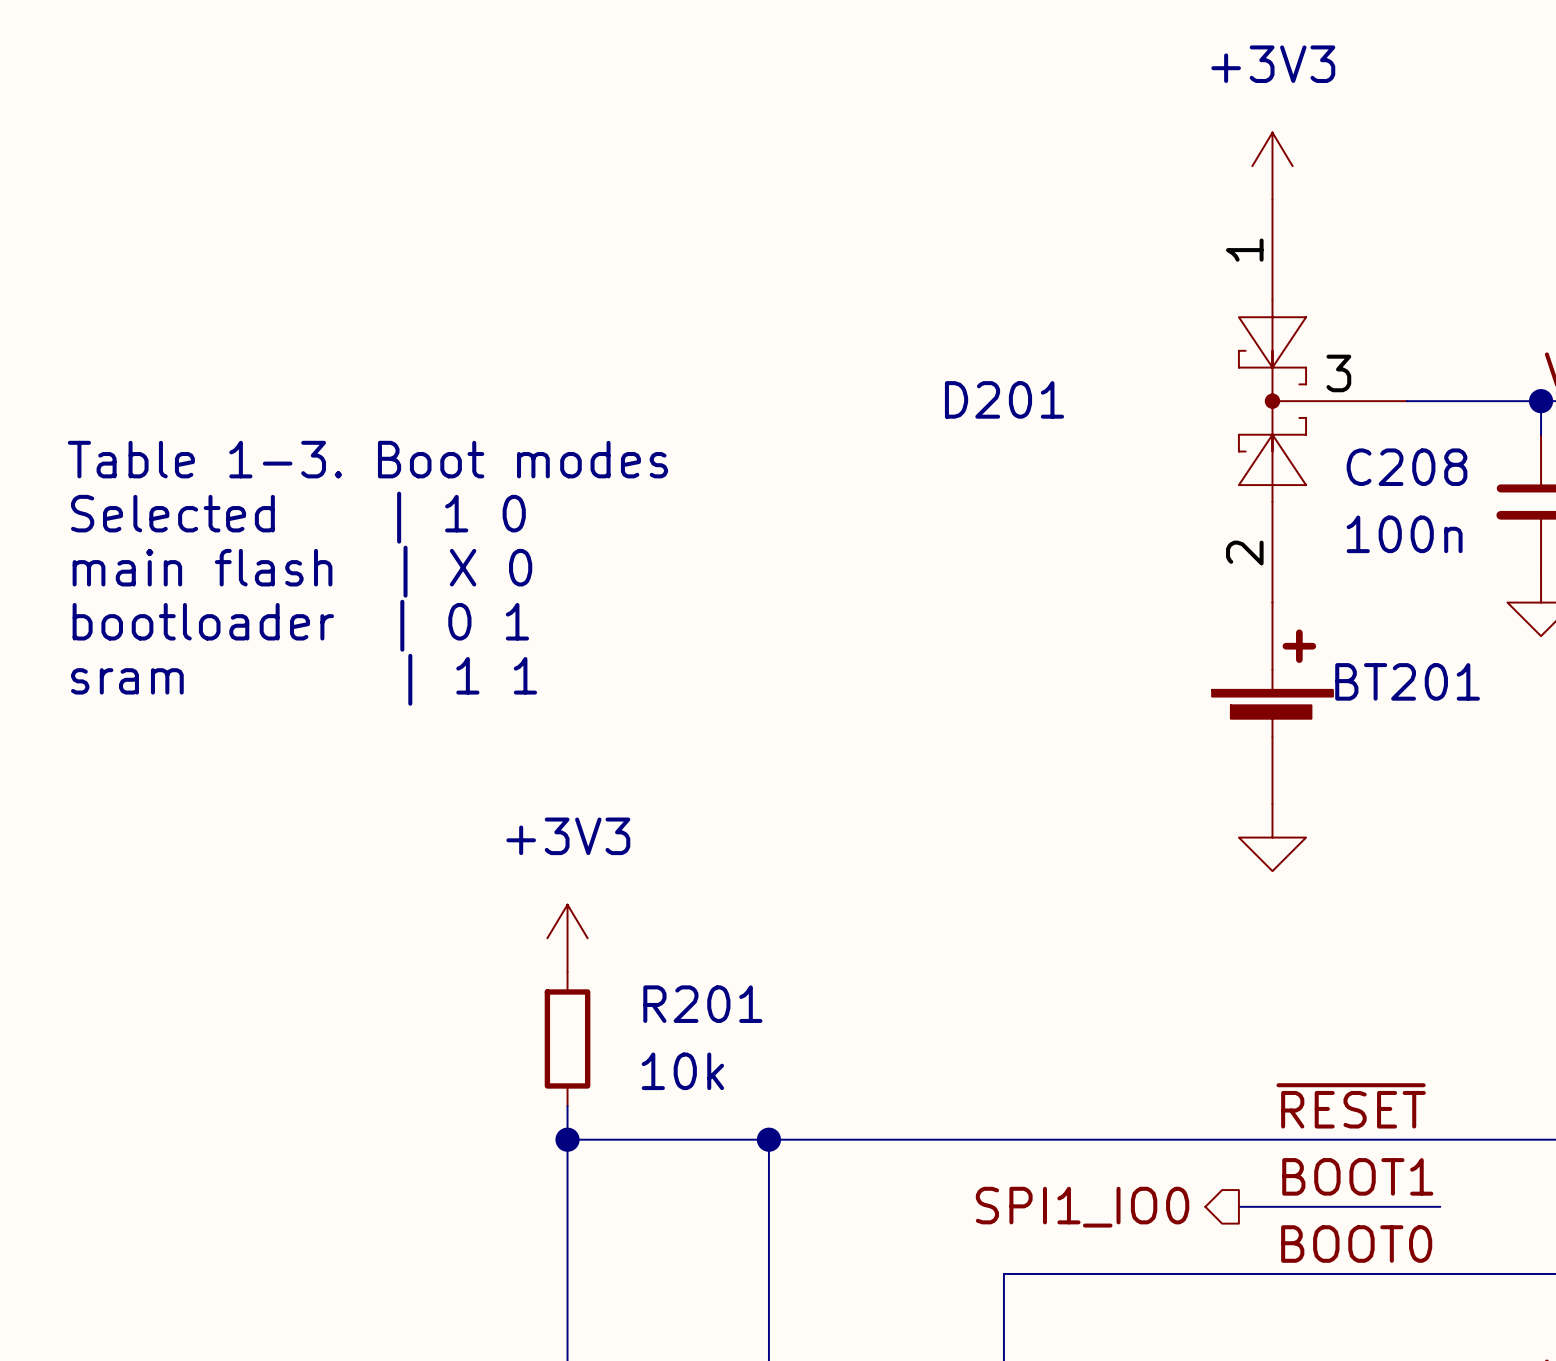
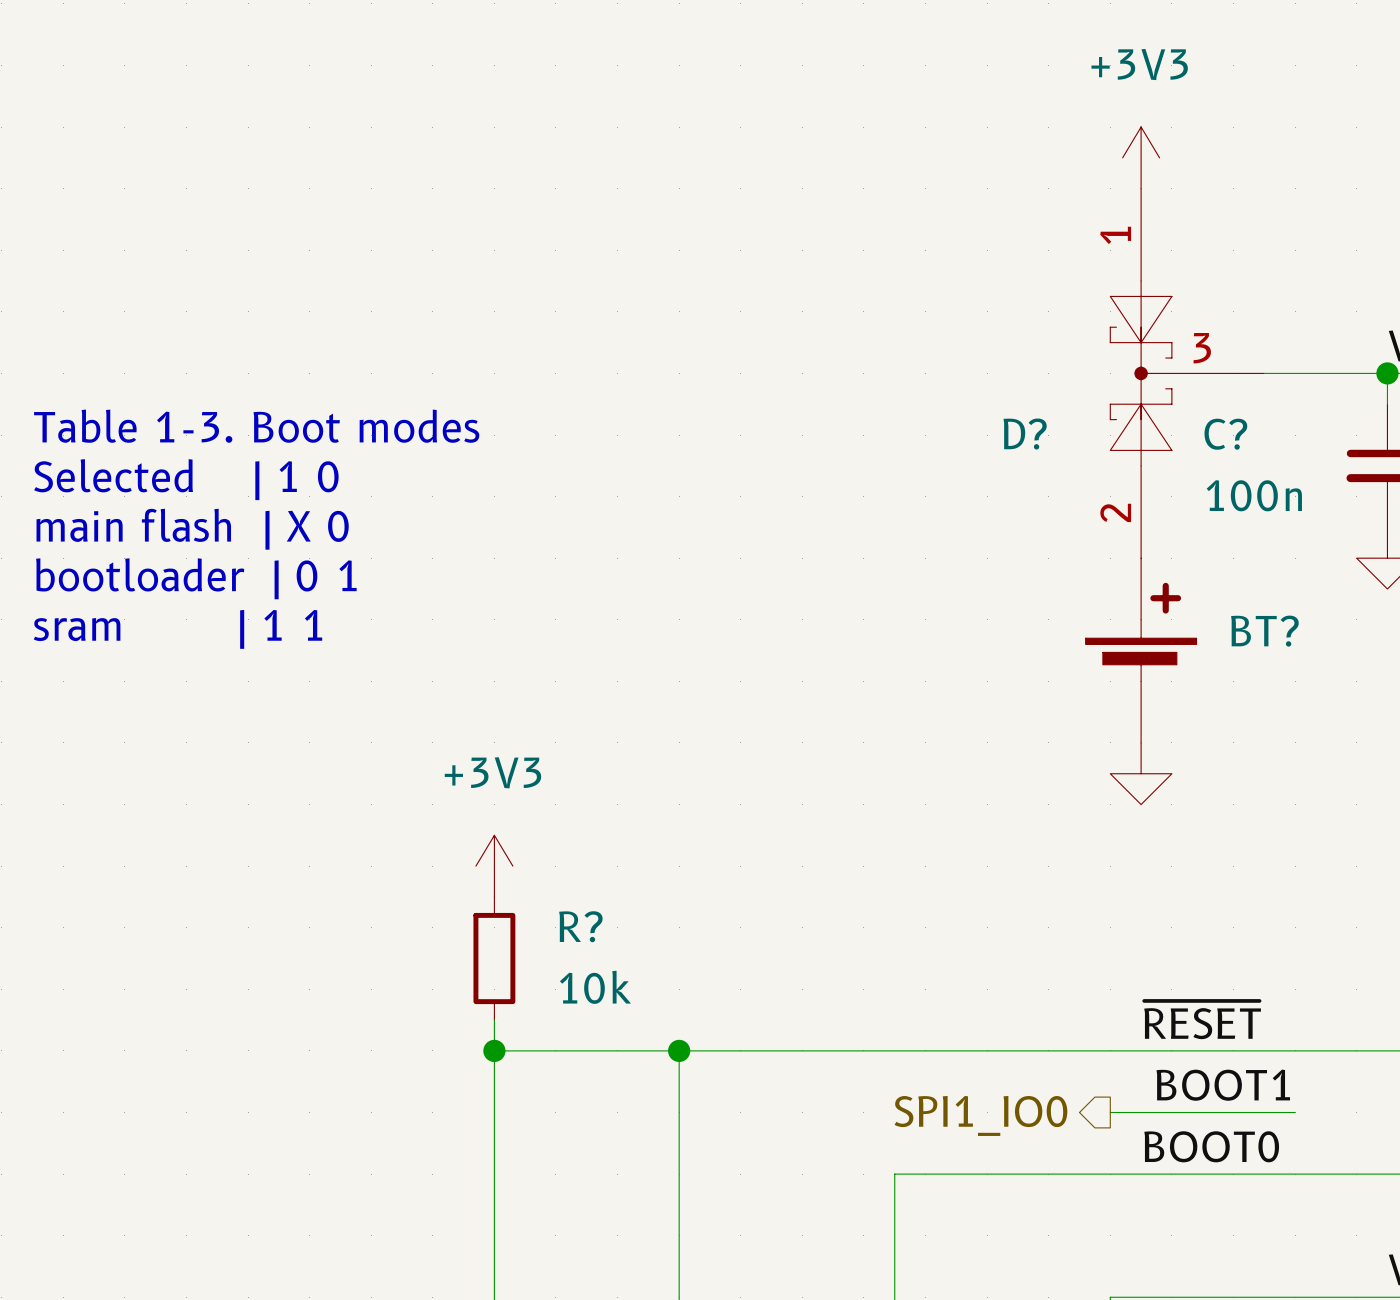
D201 name: D201 (1004, 399) -> D? (1025, 434)
C208 name: C208 (1407, 467) -> C? (1225, 434)
BT201 name: BT201 (1407, 681) -> BT? (1264, 631)
R201 name: R201 (702, 1004) -> R? (580, 926)

